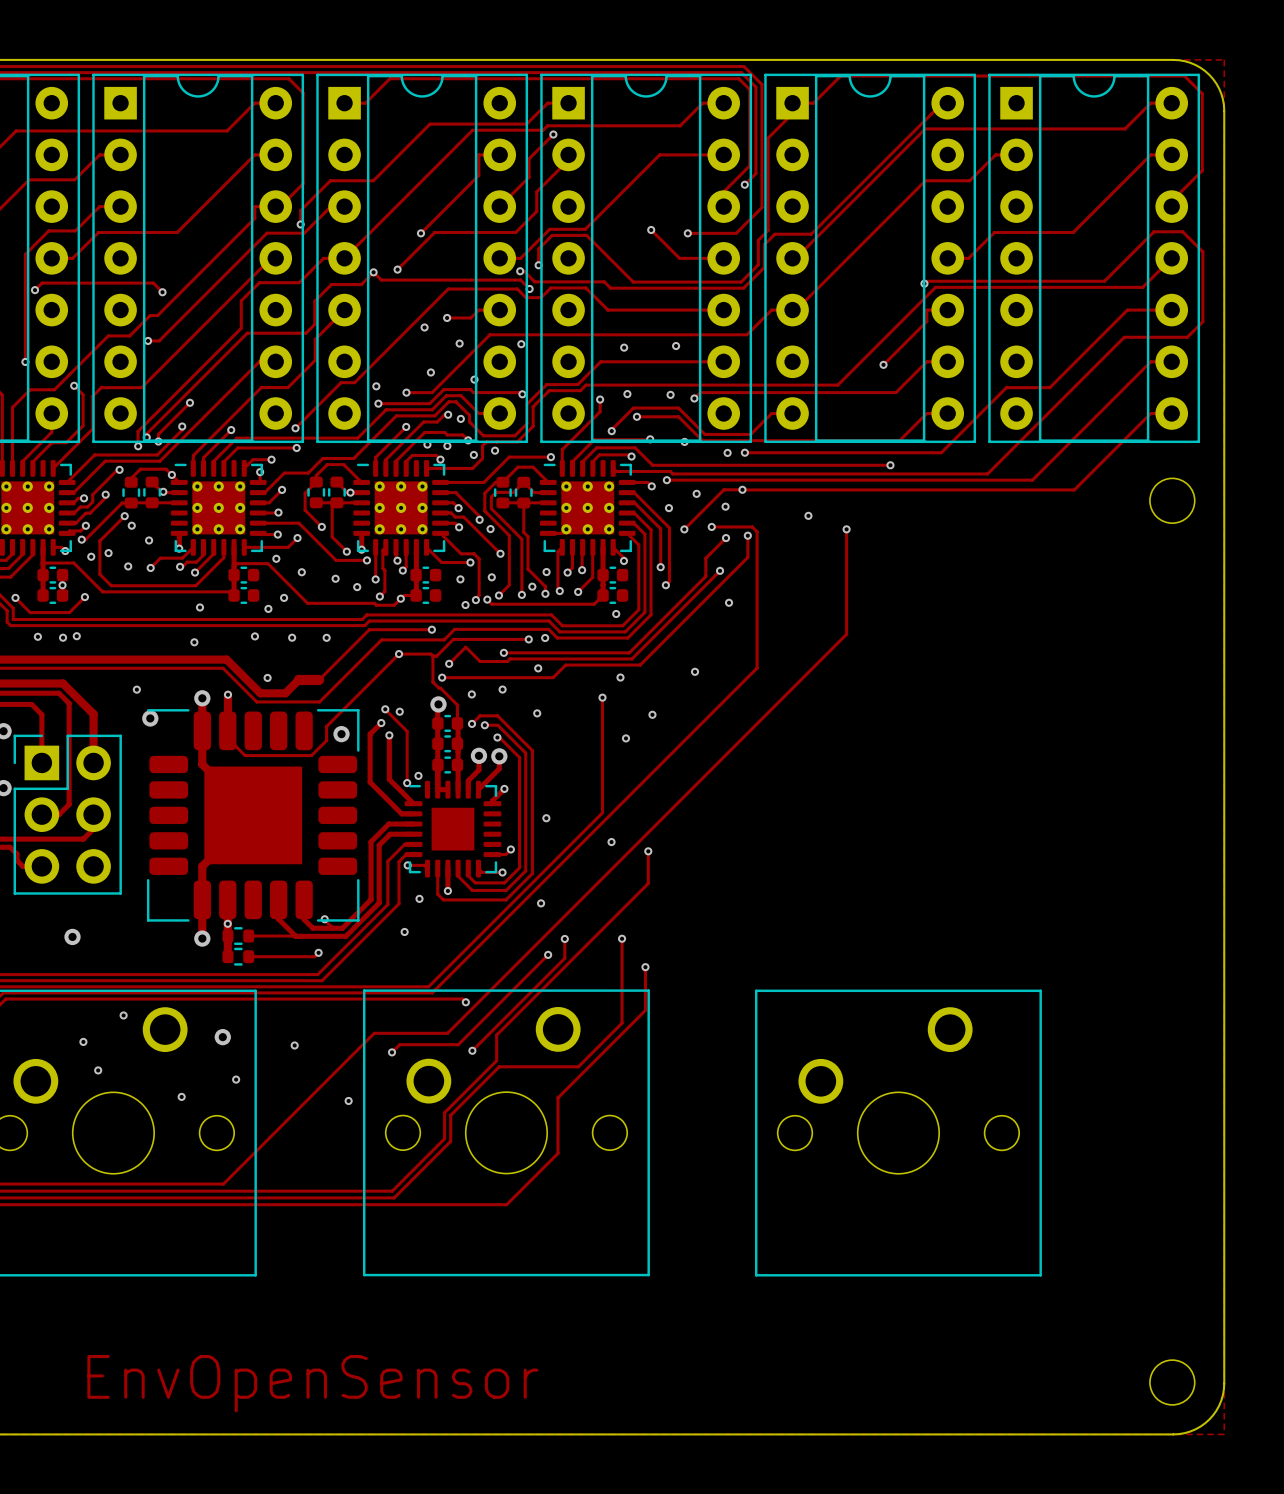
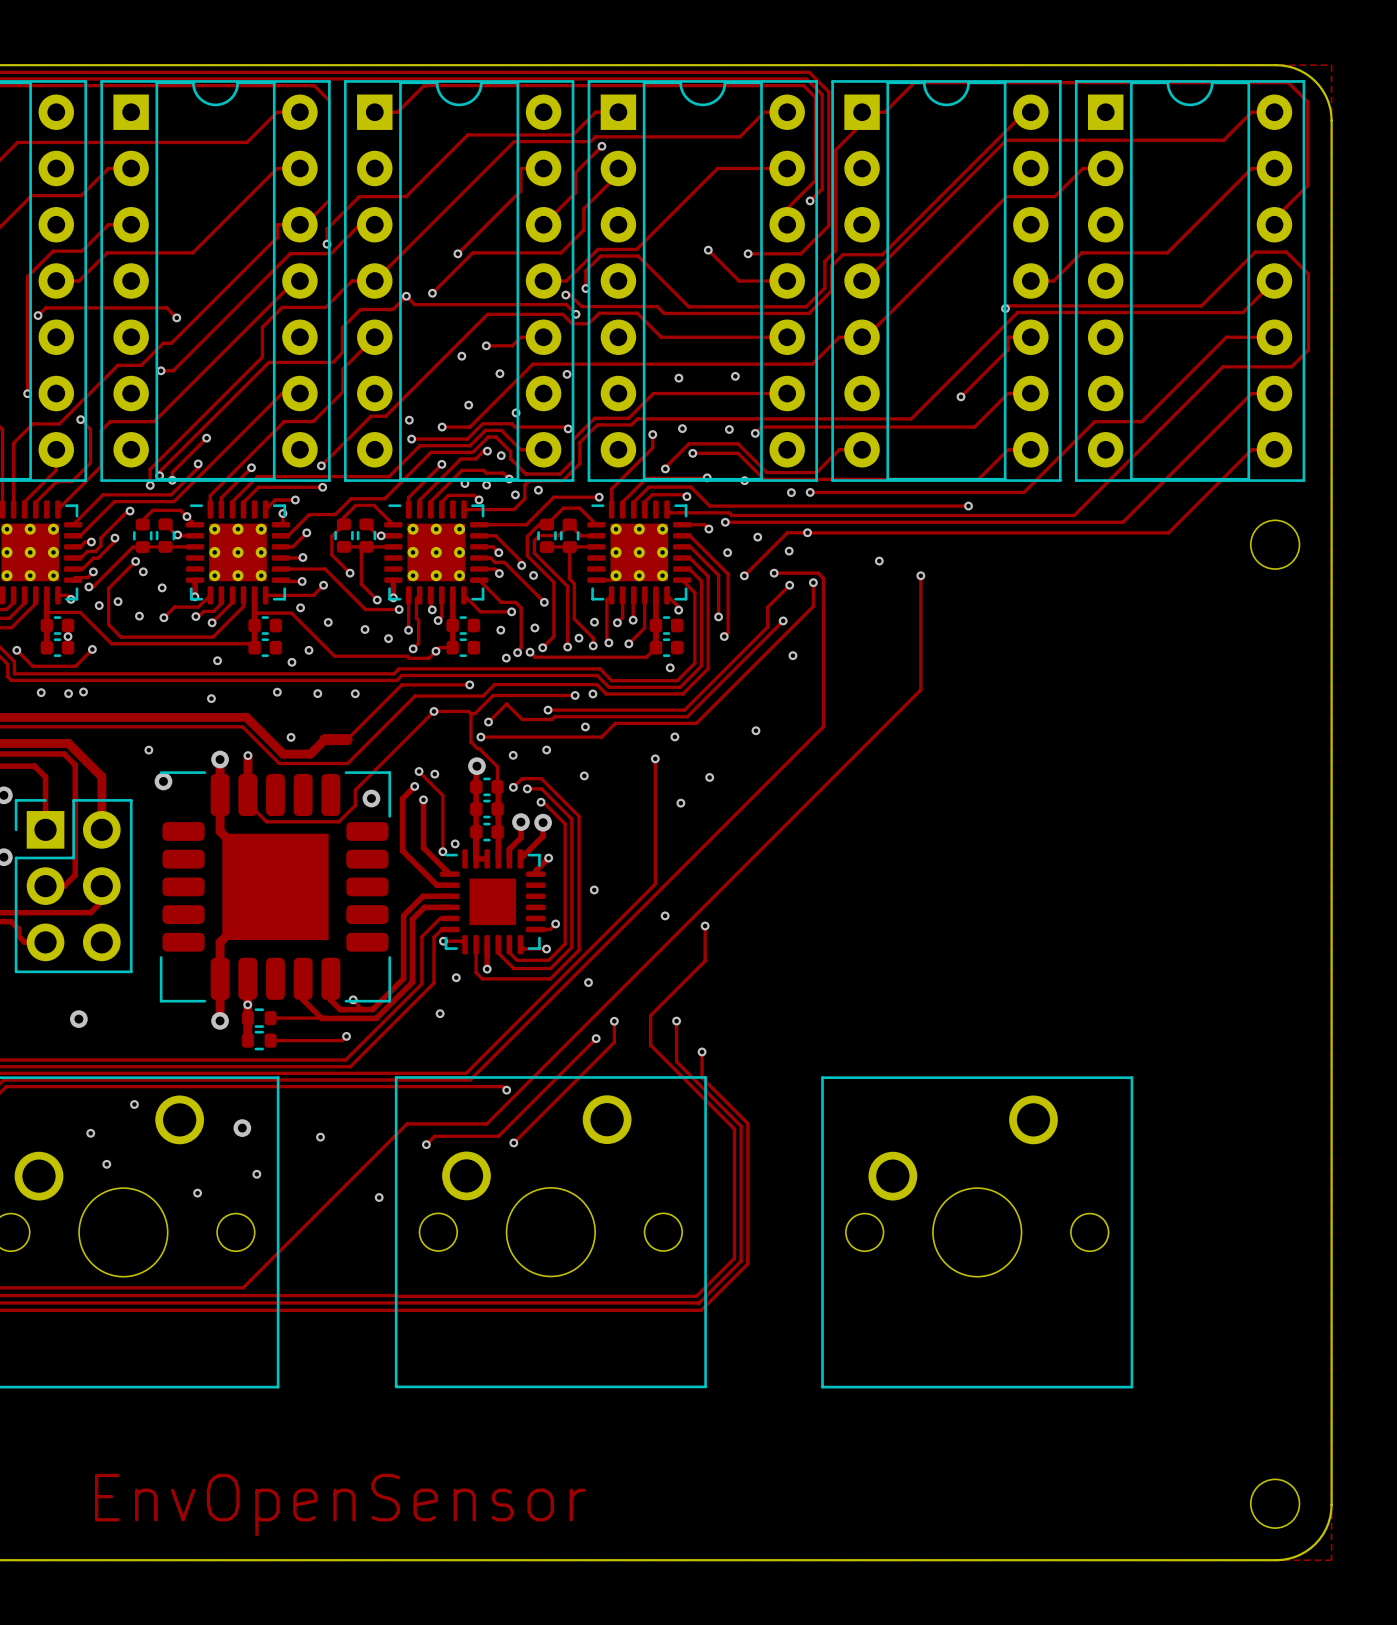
track: (598, 933) (496, 1035) (496, 1060) (444, 1112) (444, 1138) (392, 1191) (364, 1191) -> (650, 1015) (650, 1045) (734, 1129) (734, 1258) (696, 1296) (396, 1295)
track: (622, 976) (622, 1023) (578, 1066) (499, 1066) (450, 1115) (450, 1141) (394, 1197) -> (676, 1061) (741, 1126) (741, 1261) (698, 1303) (428, 1302)
track: (645, 990) (645, 1010) (558, 1097) (558, 1153) (506, 1204) -> (702, 1077) (747, 1123) (747, 1263) (701, 1310) (551, 1310)

